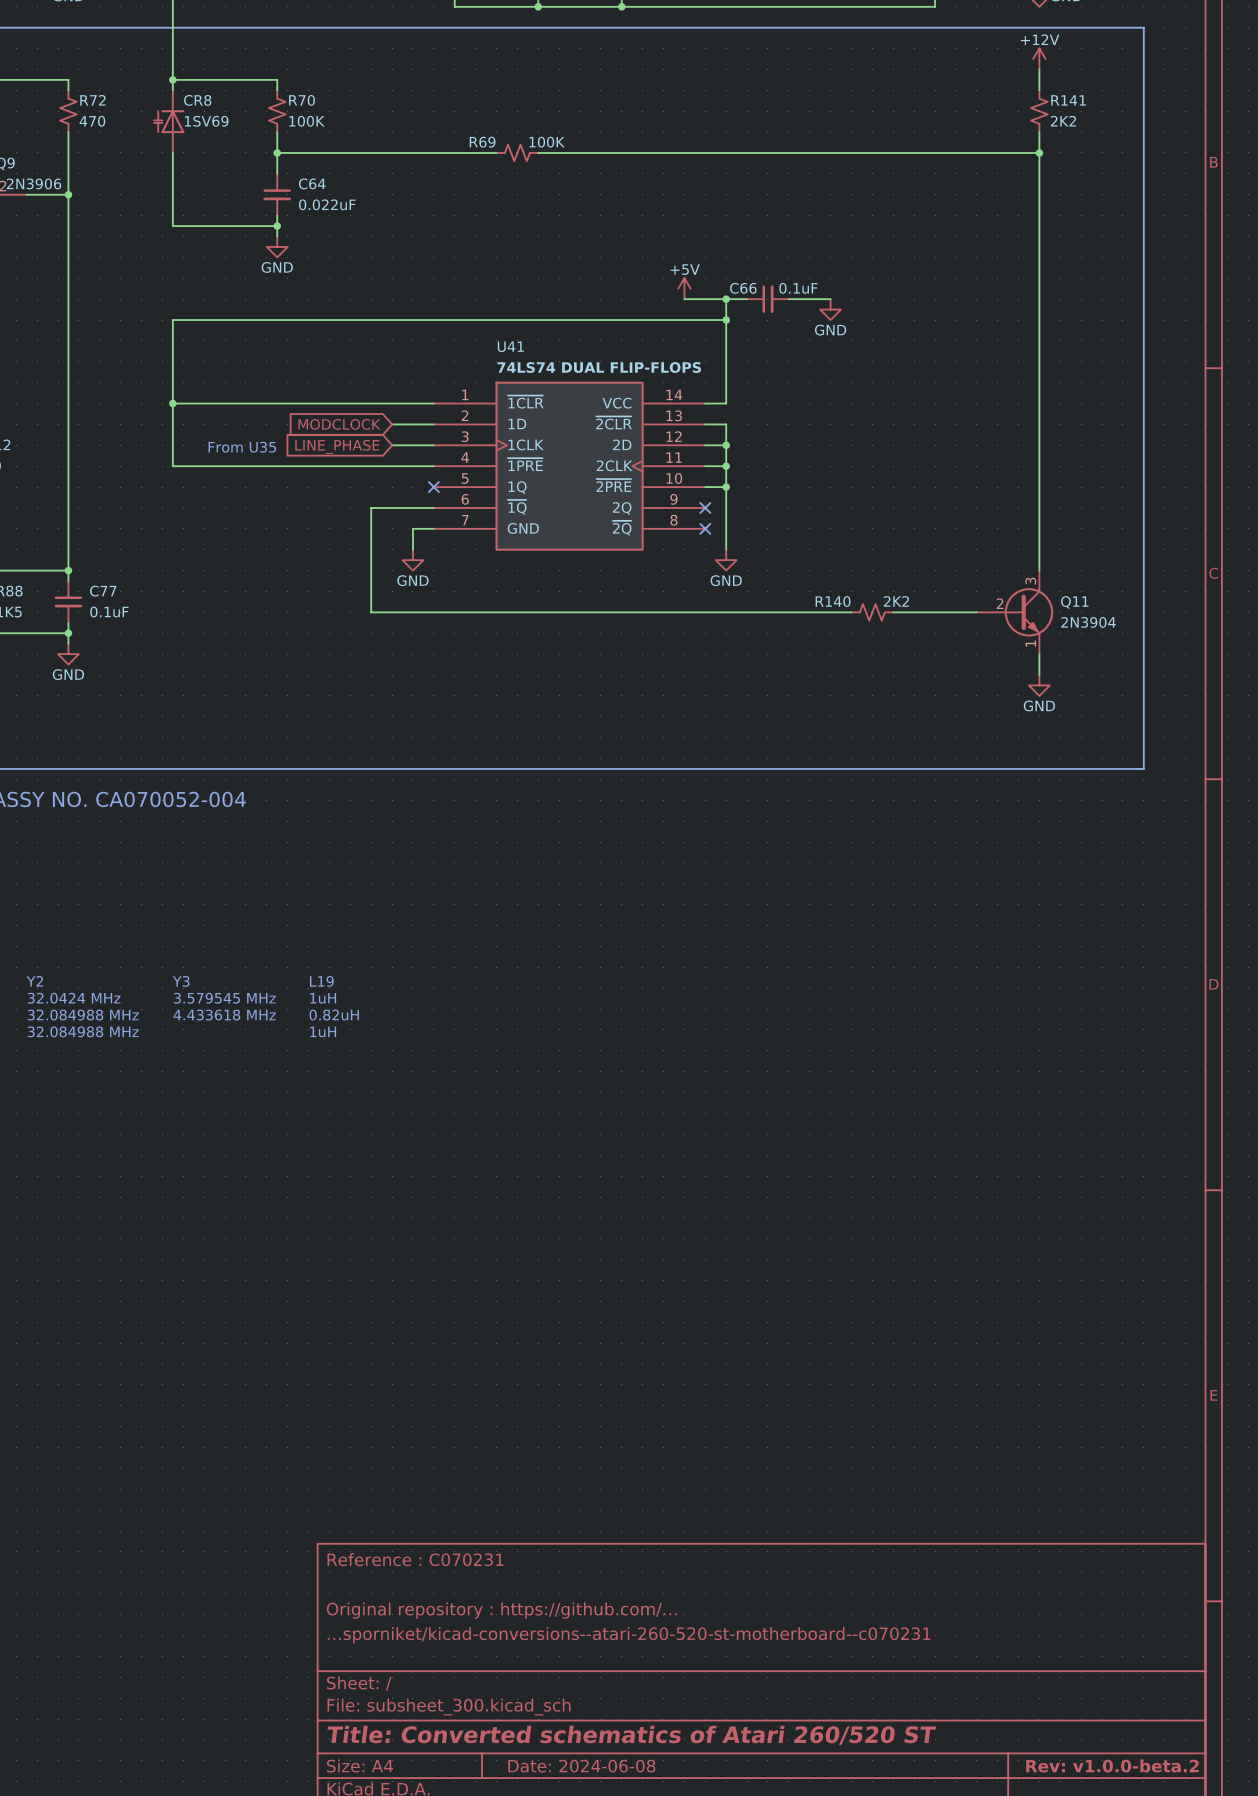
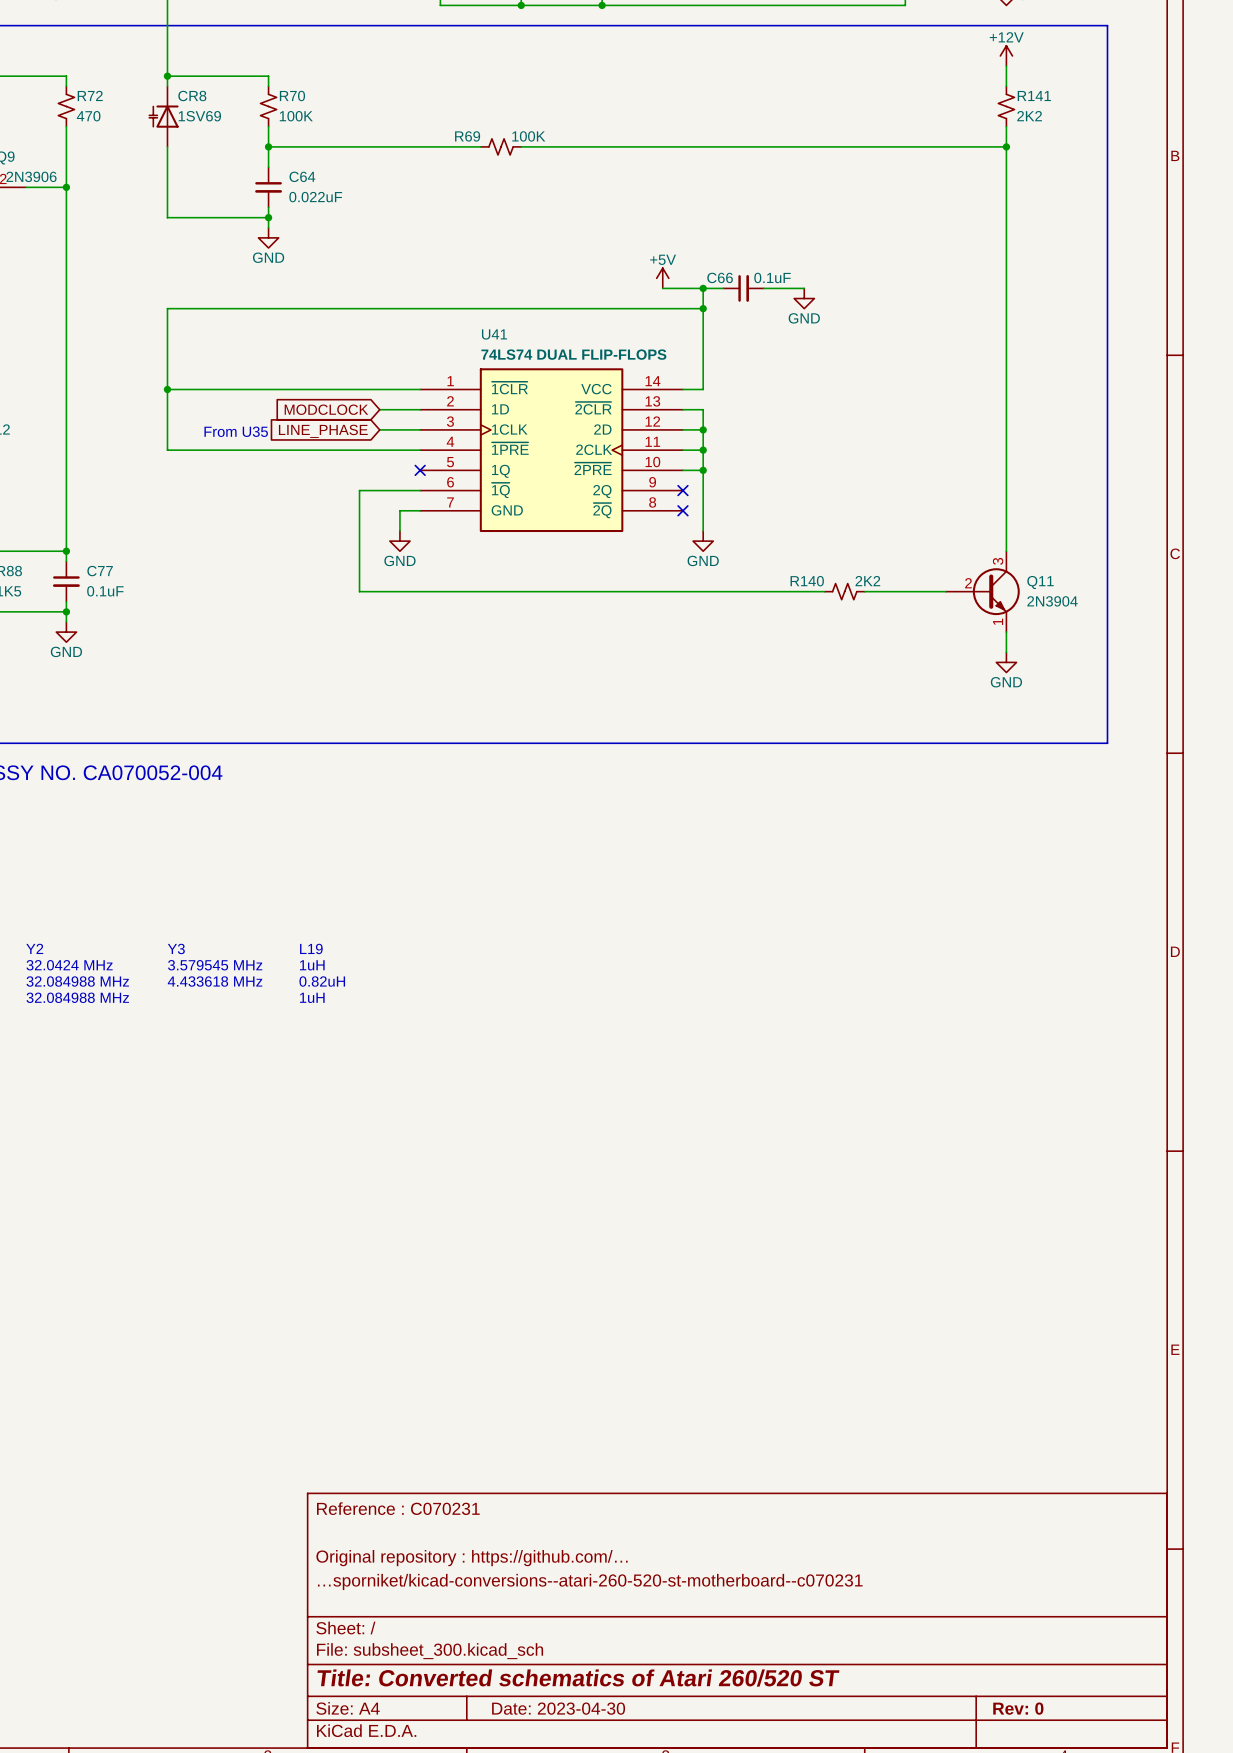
title block: Rev: v1.0.0-beta.2 (1112, 1765) -> Rev: 0 (1018, 1708)
title block: Date: 2024-06-08 (581, 1766) -> Date: 2023-04-30 (558, 1708)

